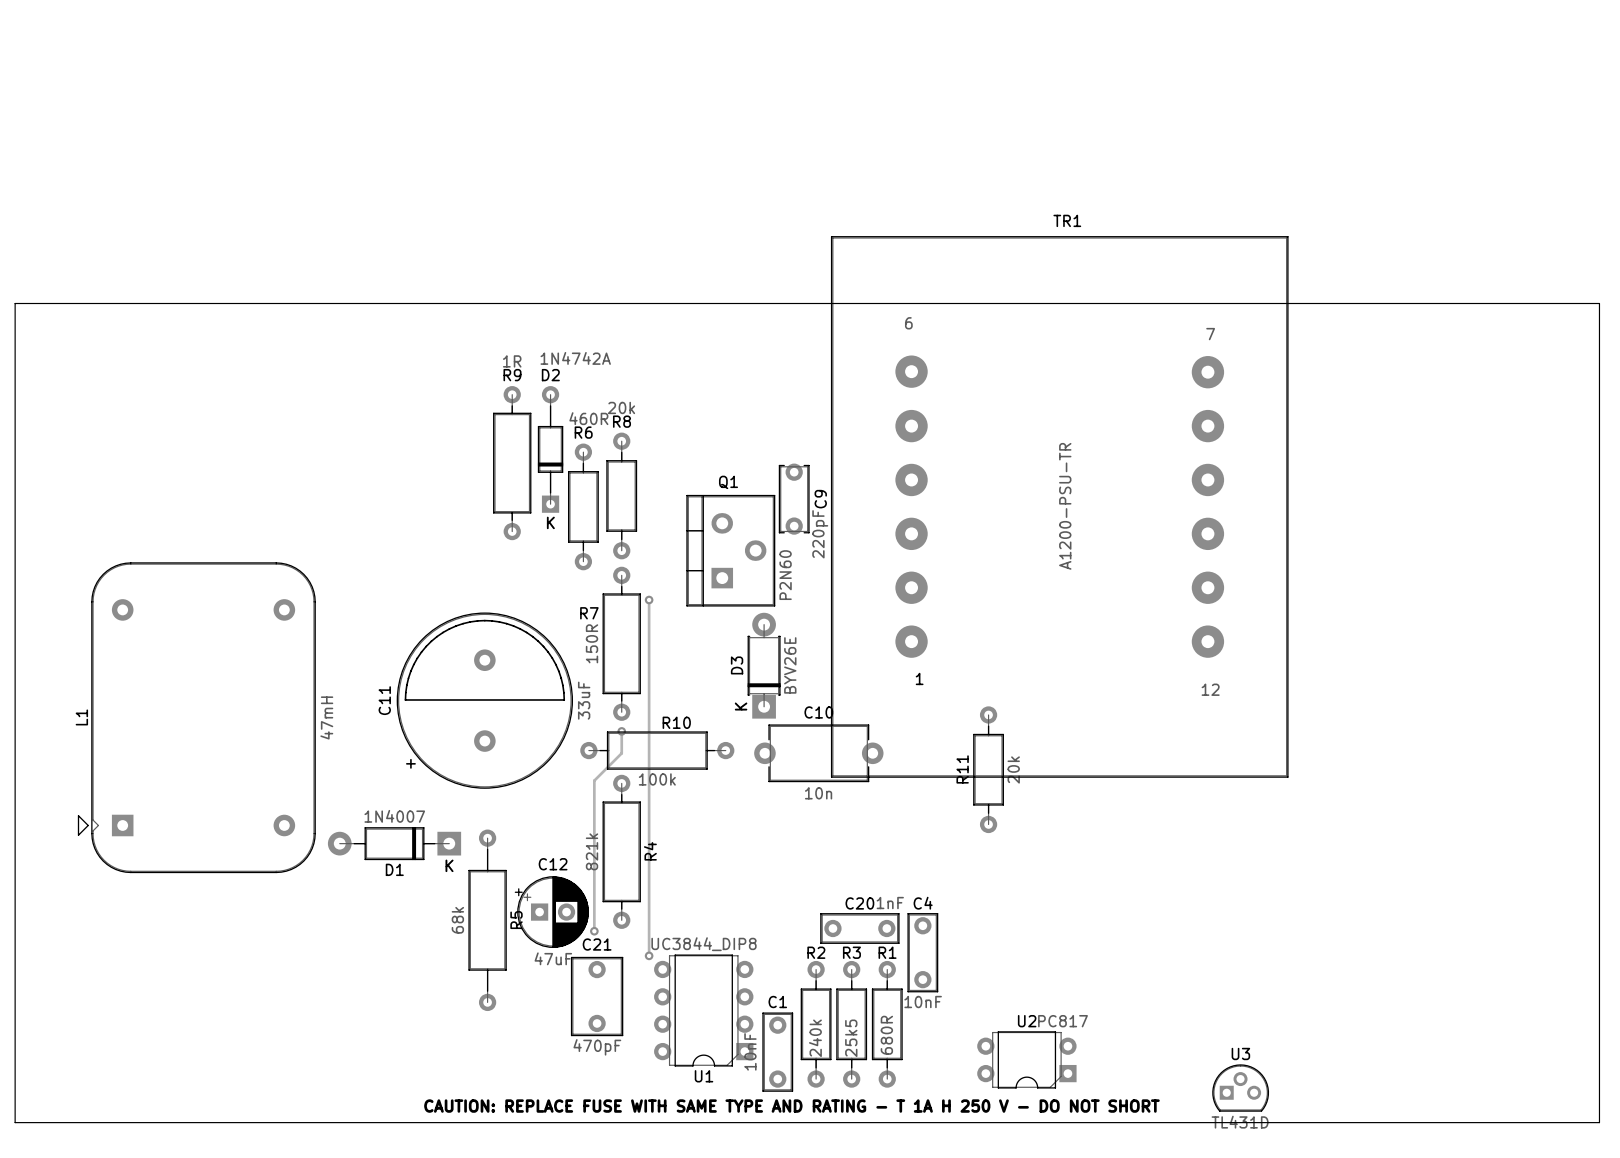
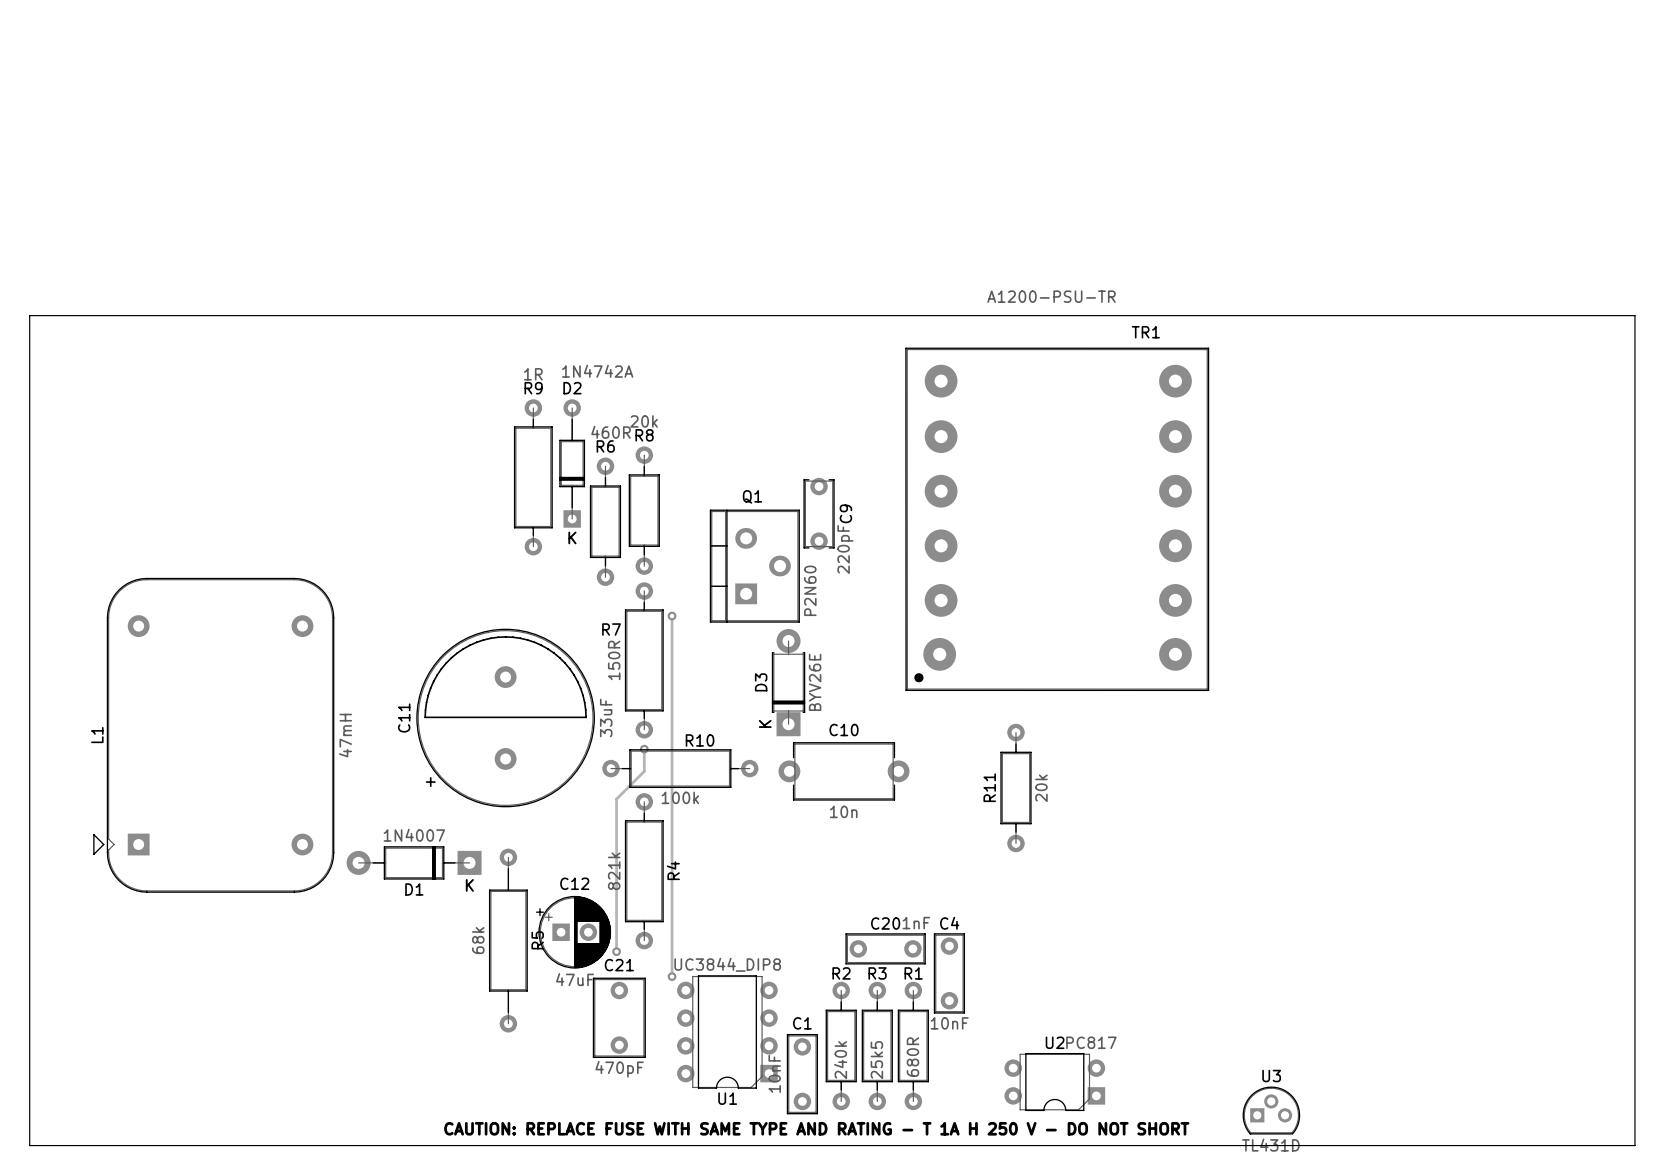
TR1 name position: TR1 (1067, 220) -> TR1 (1145, 332)
TR1 footprint: [830, 236, 1289, 778] -> [905, 347, 1210, 692]
TR1 value position: A1200-PSU-TR (1065, 506) -> A1200-PSU-TR (1051, 296)

